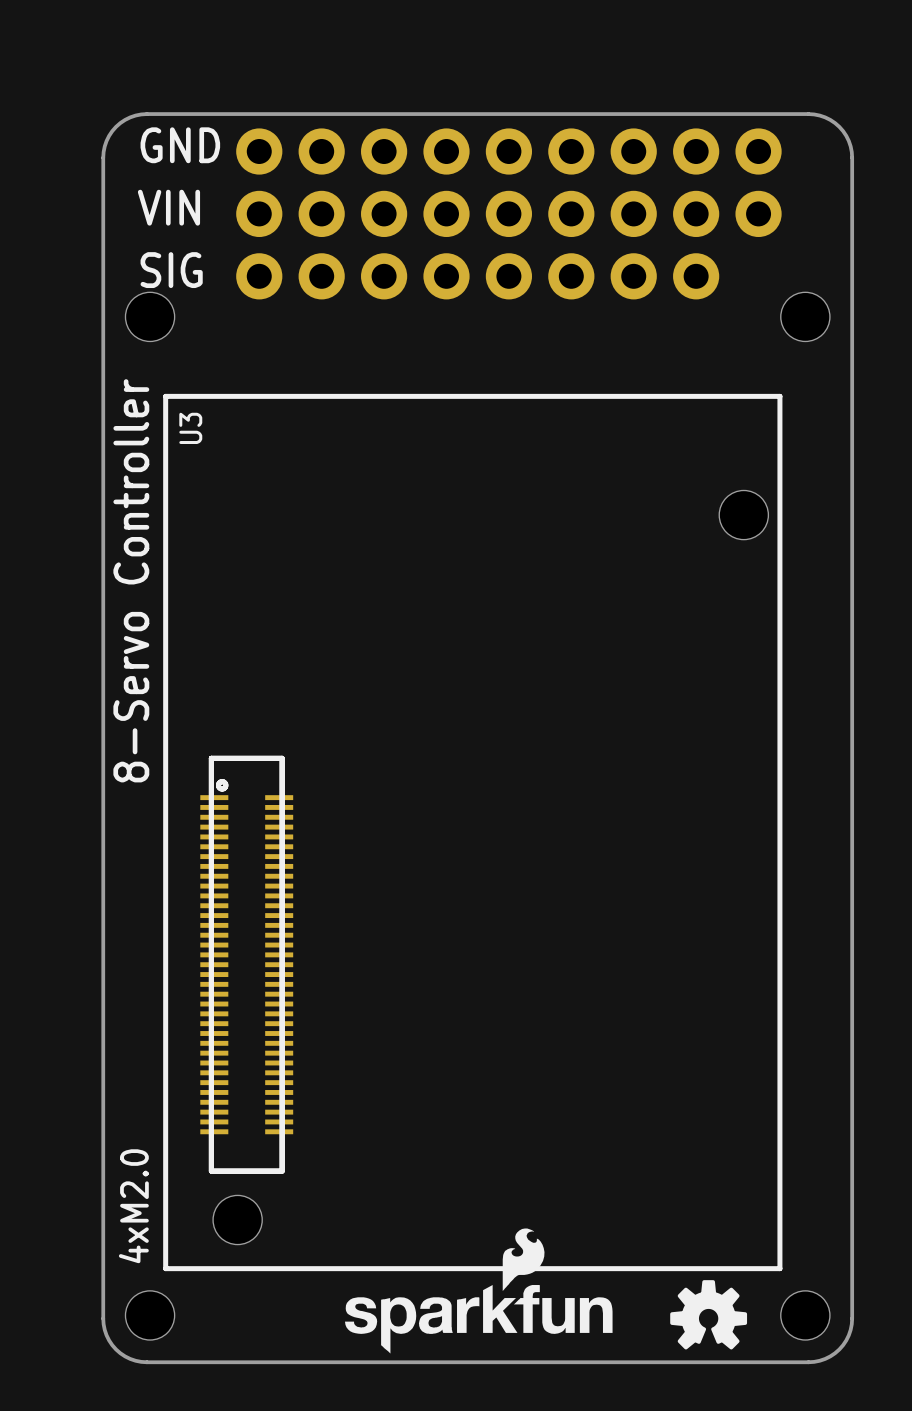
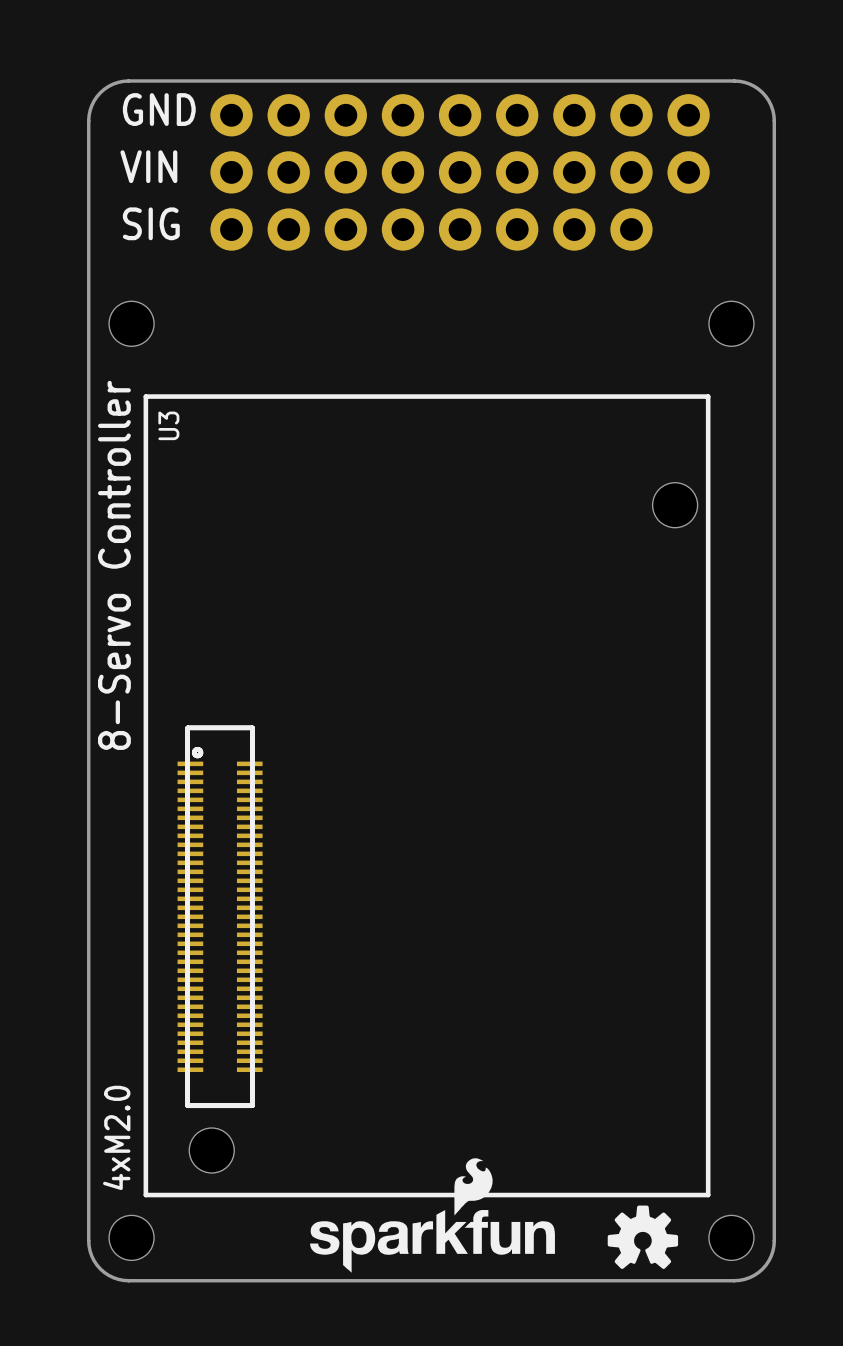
text: none -> GND (159, 109)
text: GND (180, 145) -> VIN (148, 166)
part: none -> (231, 172)
part: none -> (288, 172)
part: none -> (345, 172)
part: none -> (402, 172)
part: none -> (460, 172)
part: none -> (517, 172)
part: none -> (574, 172)
part: none -> (631, 172)
board edge: (852, 157) (848, 141) (839, 126) (825, 117) (808, 114) (146, 114) (130, 117) (116, 126) (106, 141) (103, 157) -> (774, 178) (774, 120) (771, 105) (758, 89) (749, 84) (734, 80) (123, 81) (104, 89) (91, 105) (88, 120) (88, 178)
part position: (758, 182) -> (688, 143)
text: VIN (168, 207) -> SIG (151, 223)
part: (259, 213) -> none
part: (321, 213) -> none
part: (384, 213) -> none
part: (446, 213) -> none
part: (508, 213) -> none
part: (571, 213) -> none
part: (633, 213) -> none
part: (696, 213) -> none
text: SIG (171, 270) -> none

